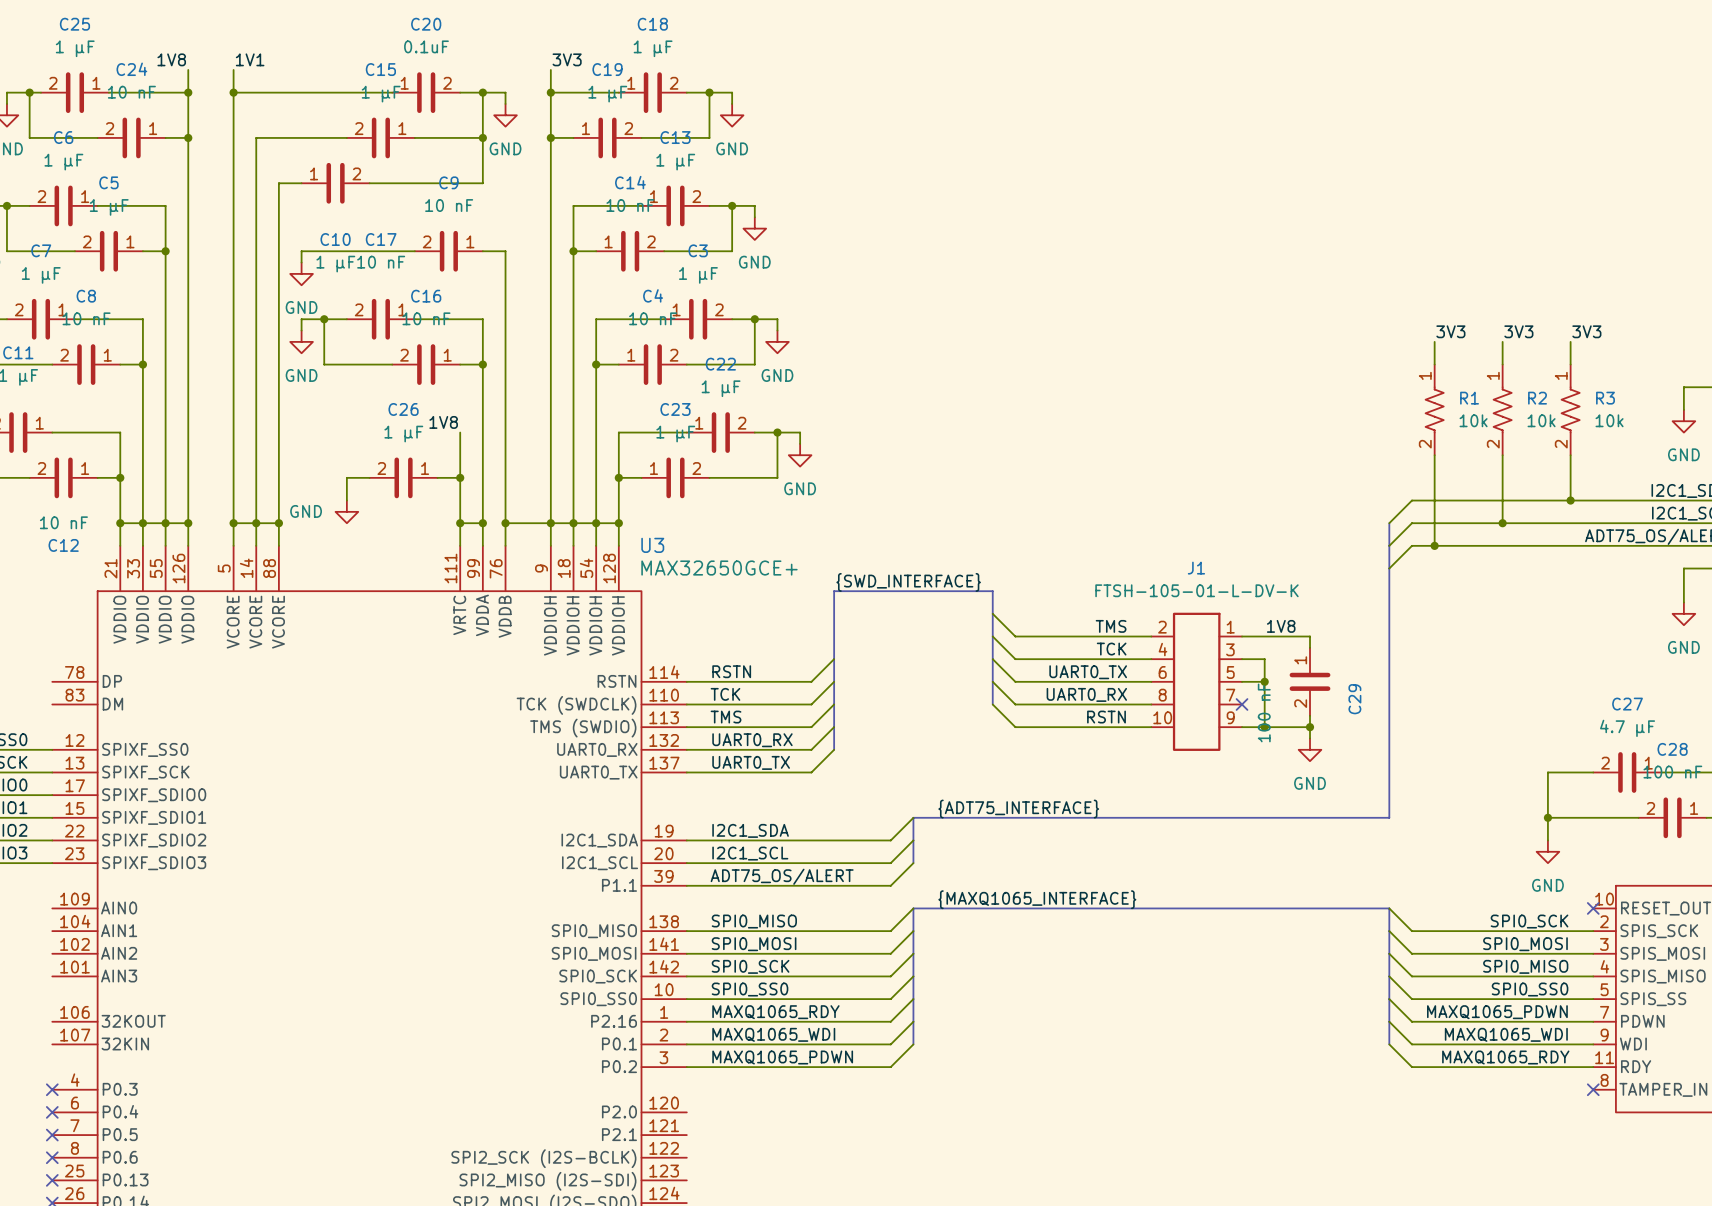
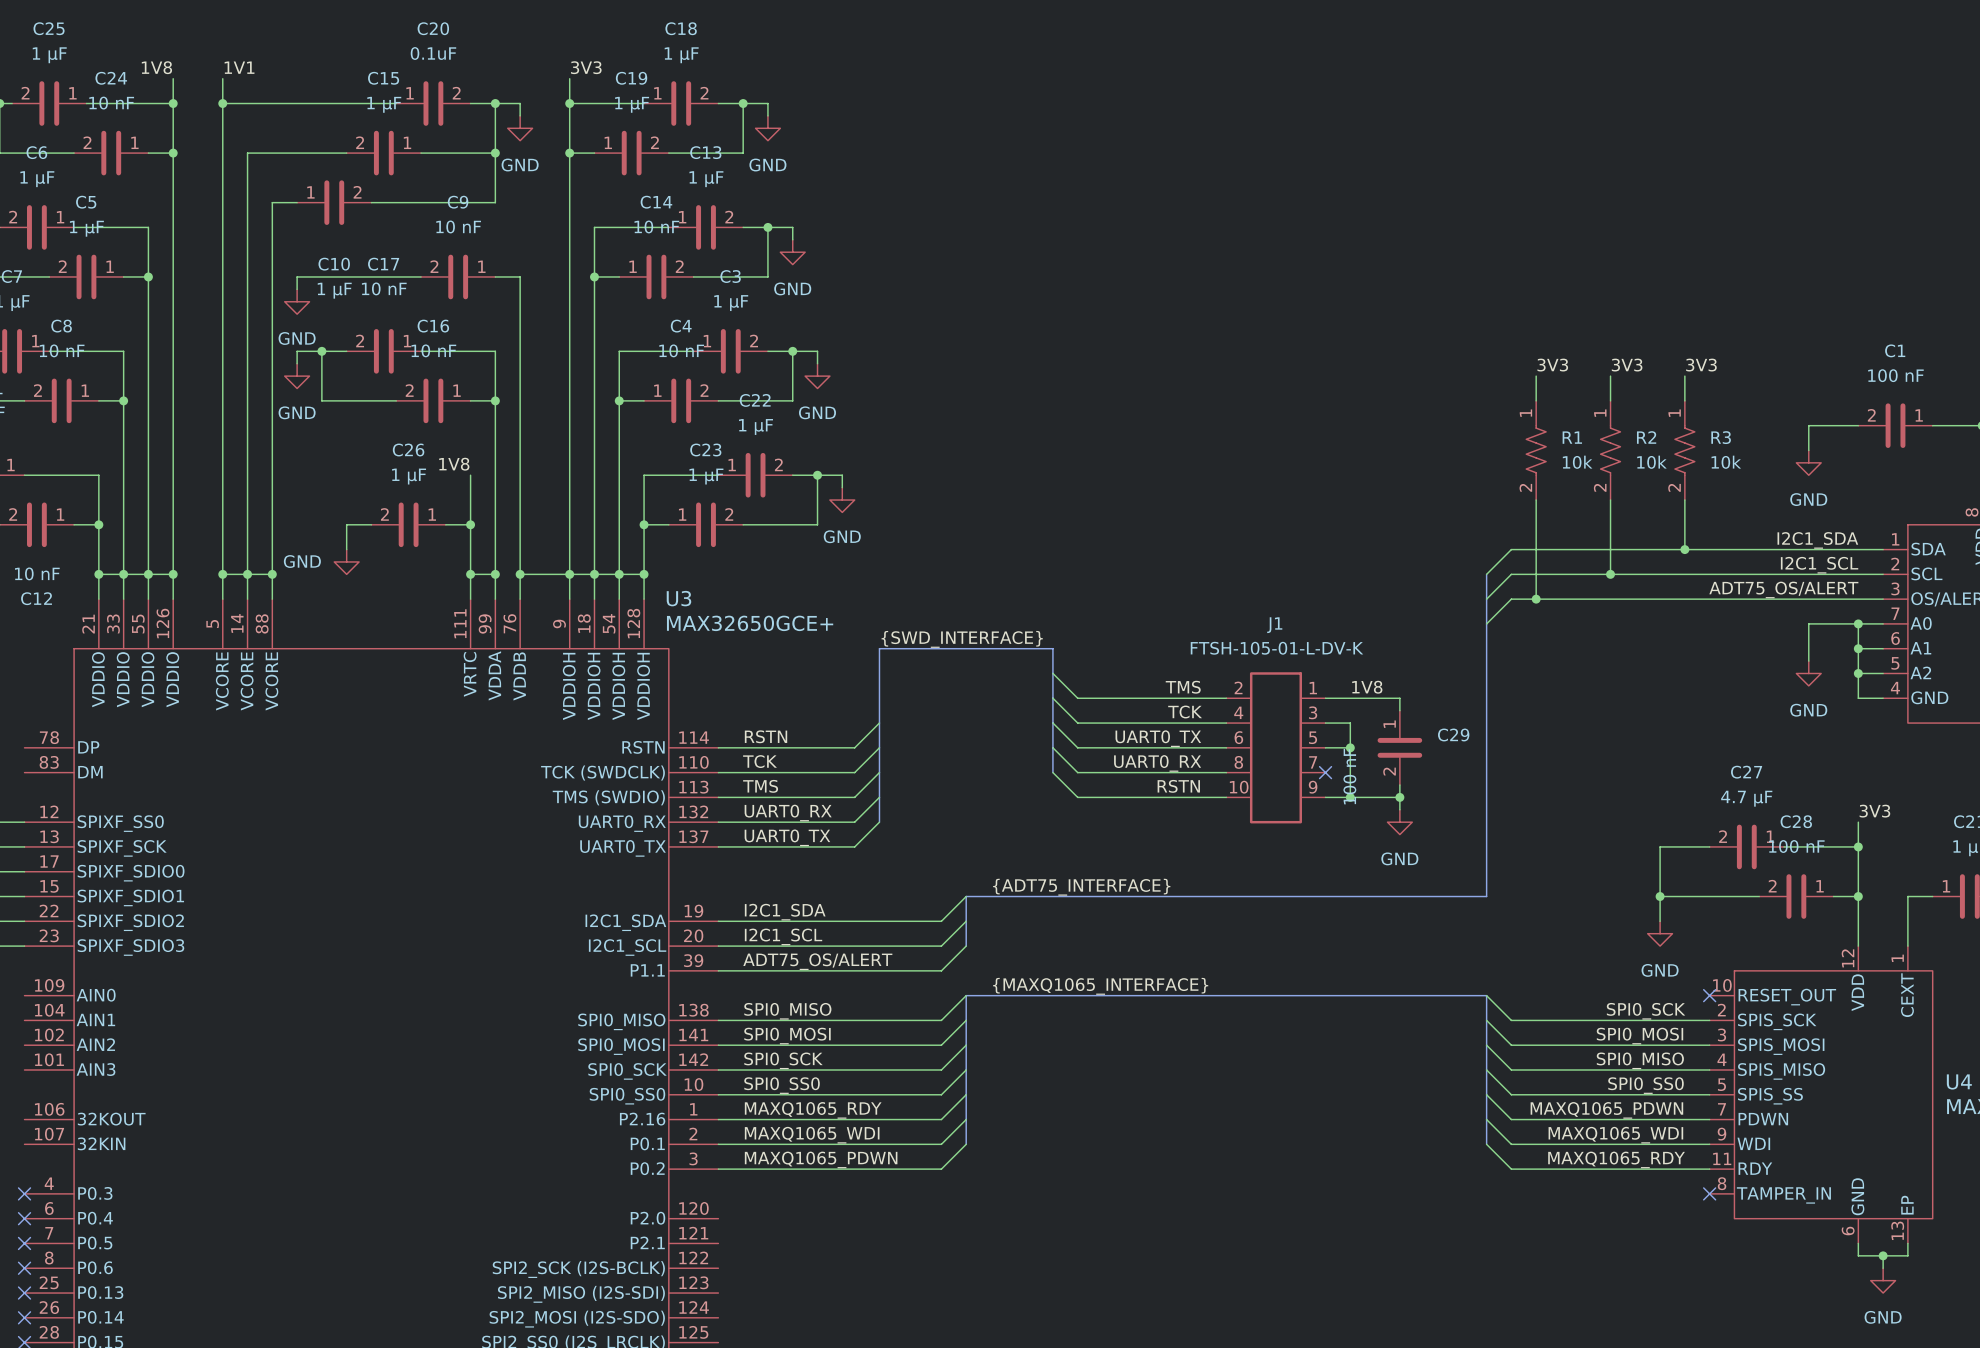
C29 name rotation: 0° (1354, 699) -> 90° clockwise (1453, 734)

